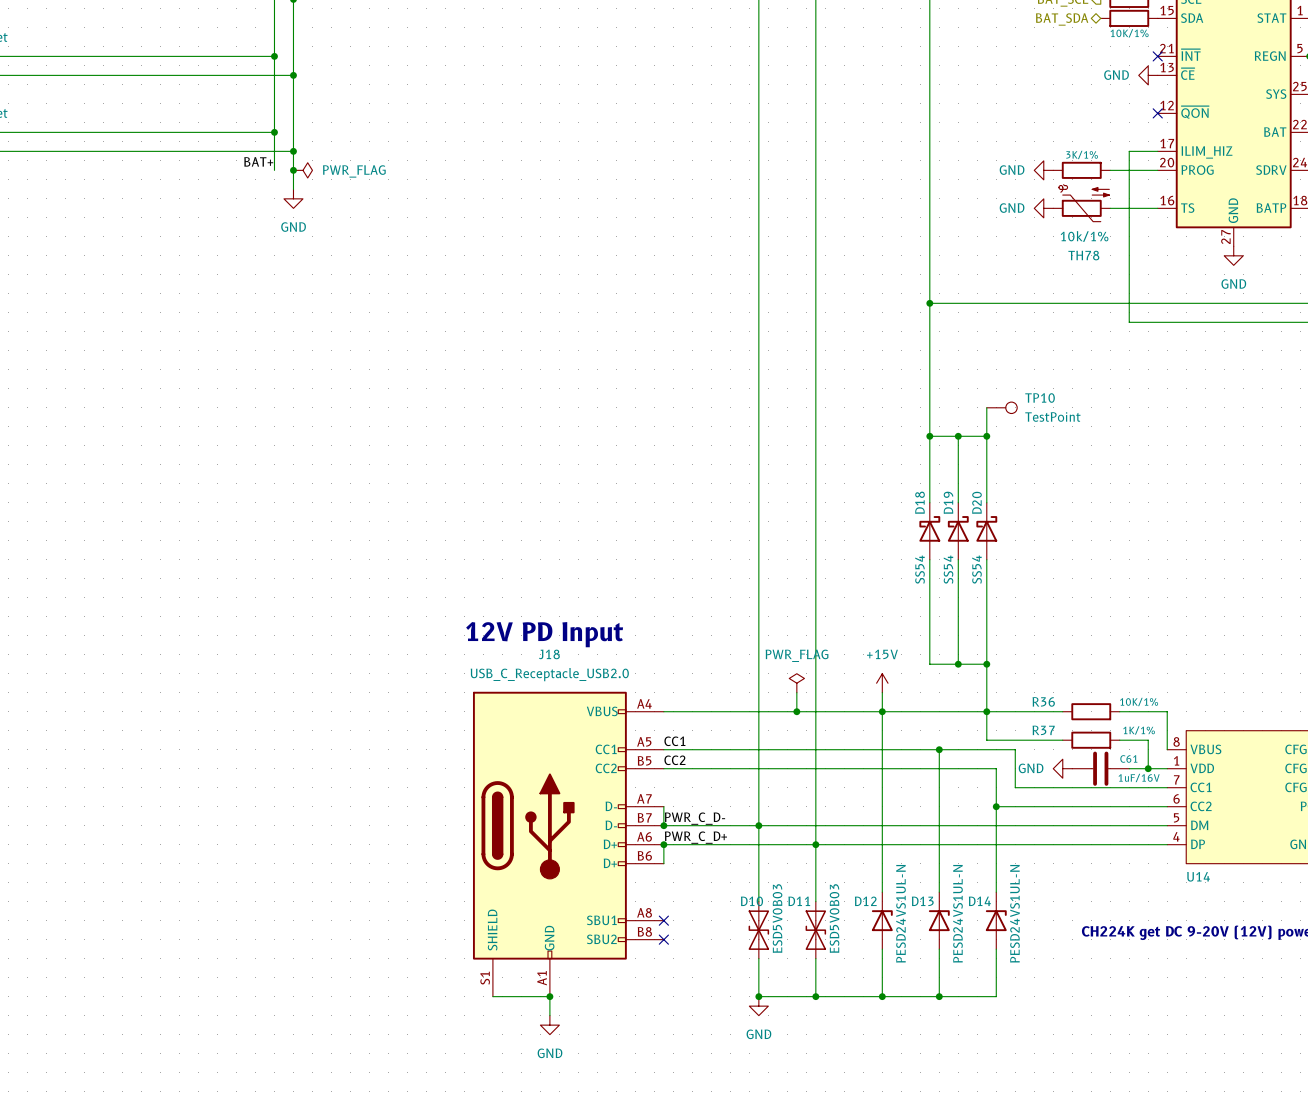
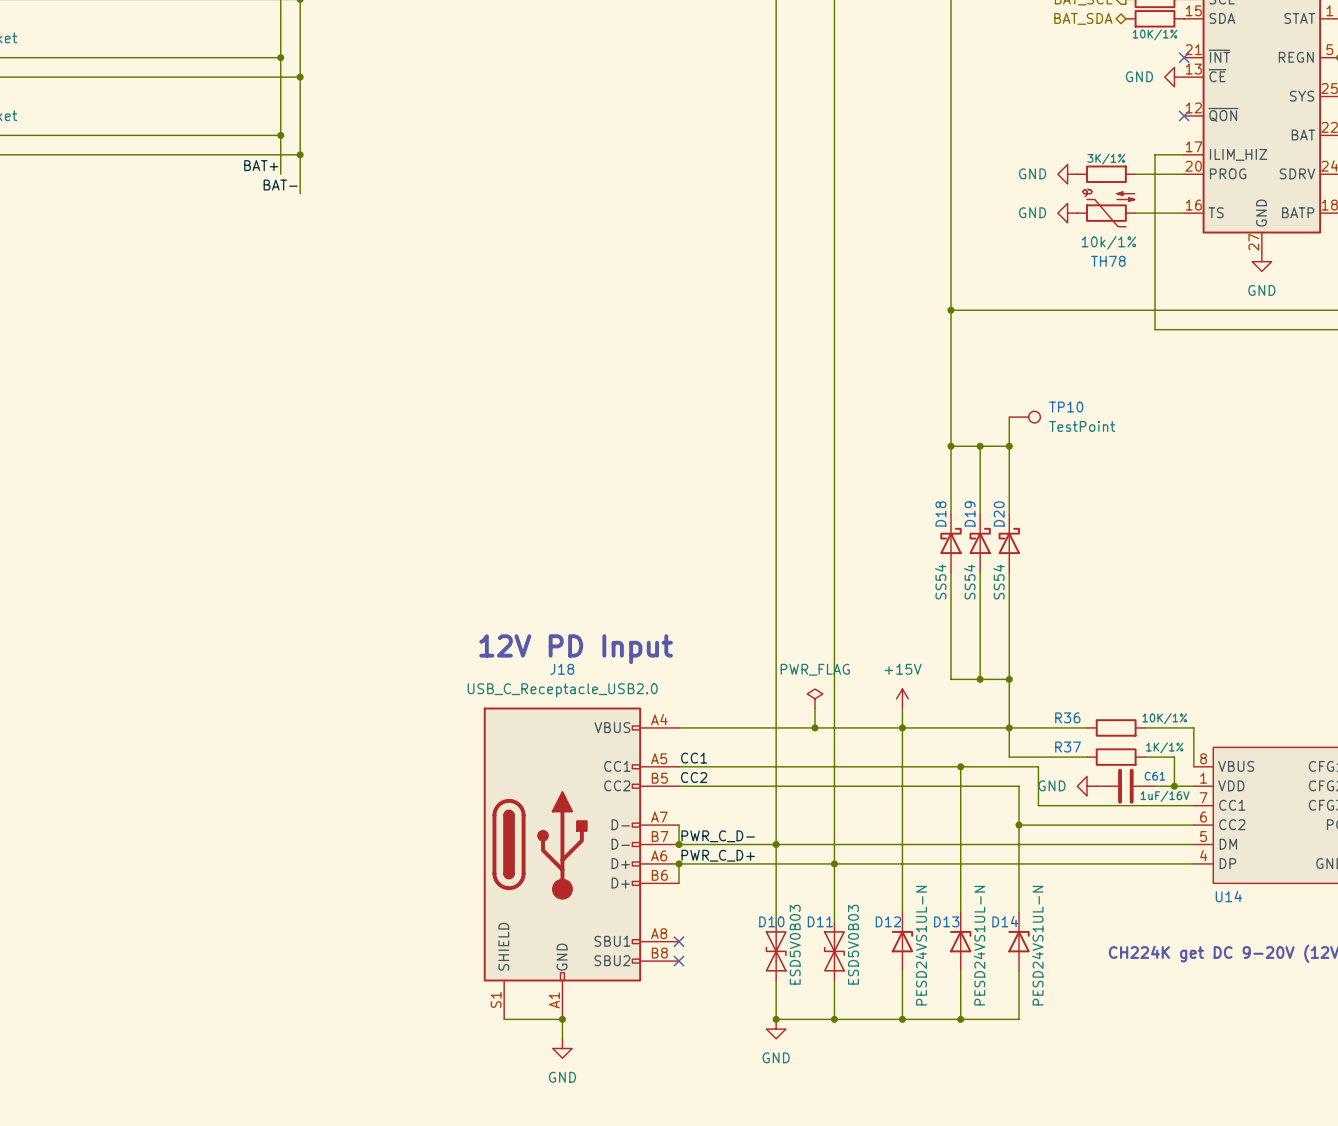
junction: (293, 170) -> none
power symbol: PWR_FLAG (302, 170) -> none
label: none -> BAT- (280, 185)
power symbol: GND (293, 198) -> none

